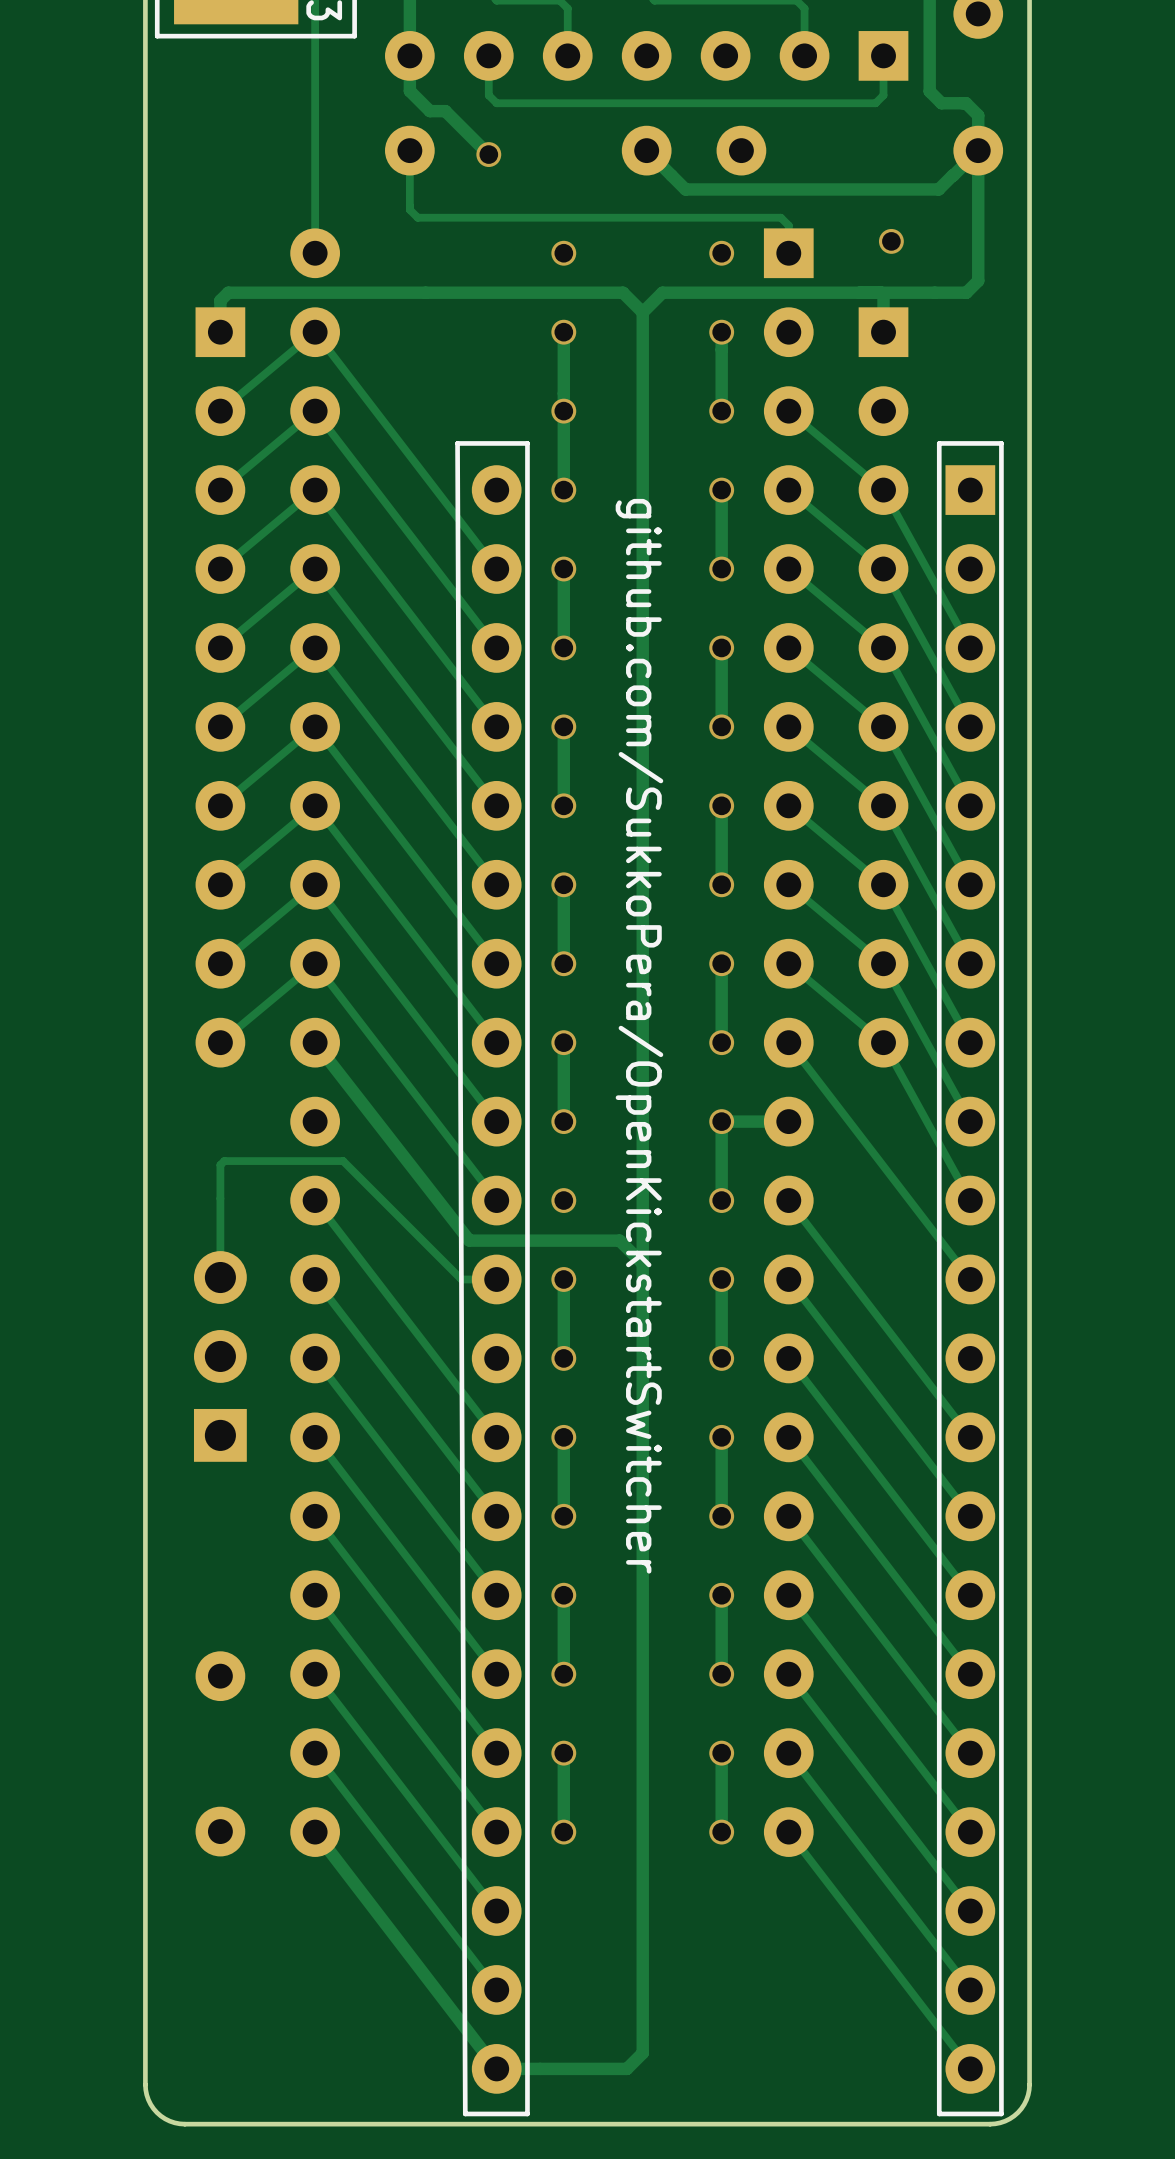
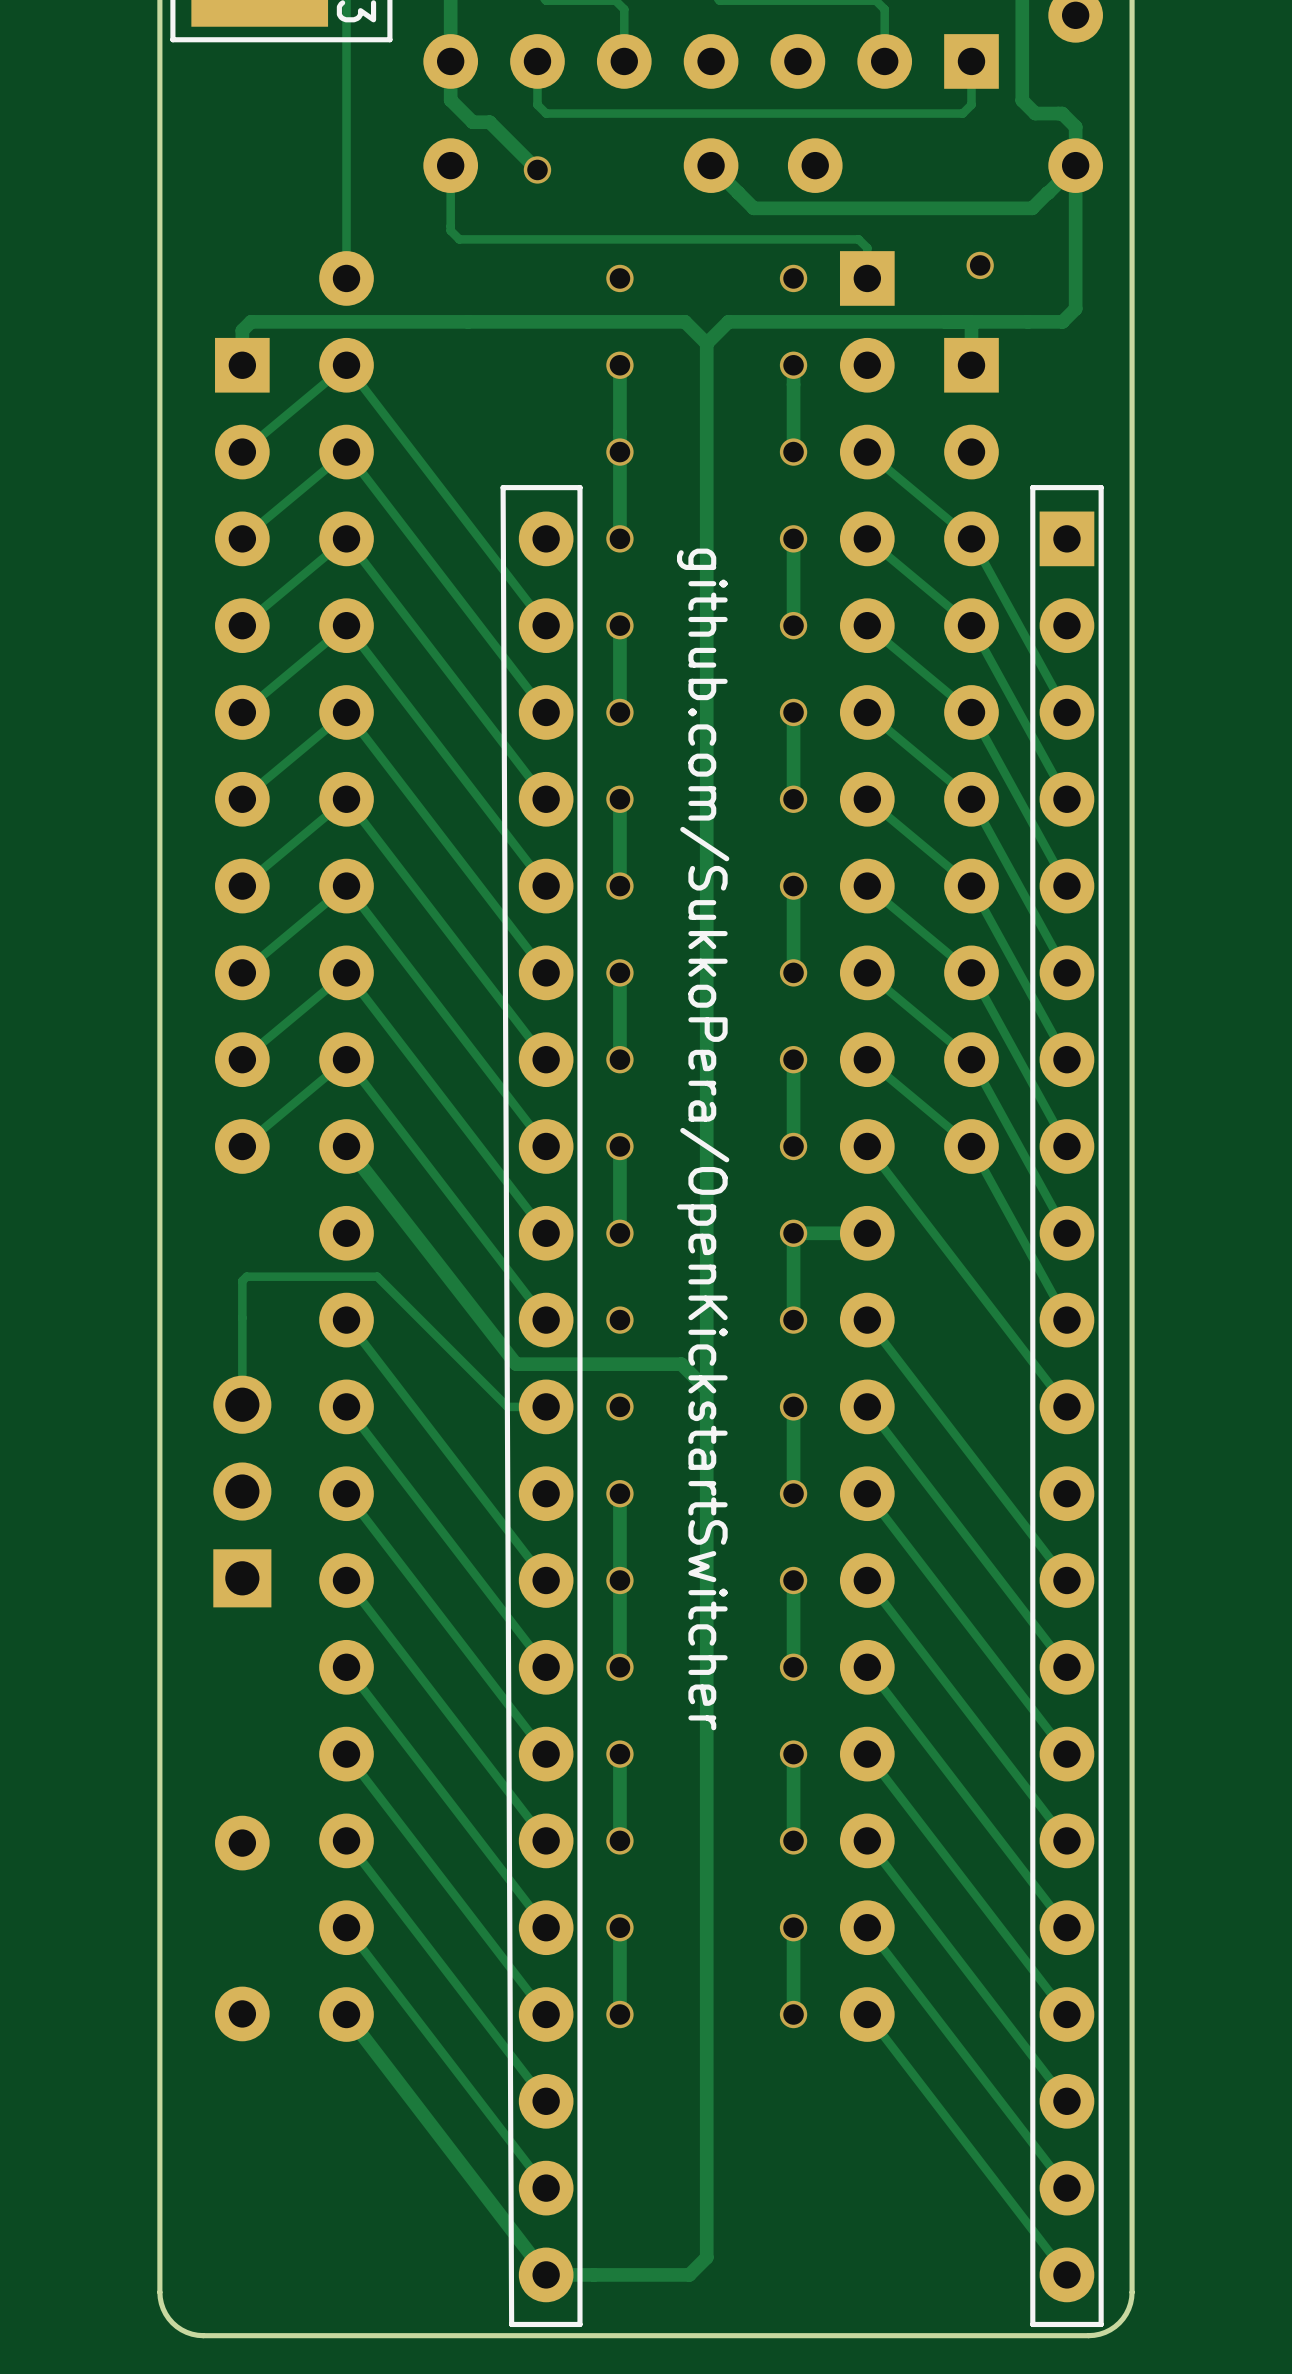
track: (563, 1279) (563, 1358) -> (619, 1580) (619, 1493)

